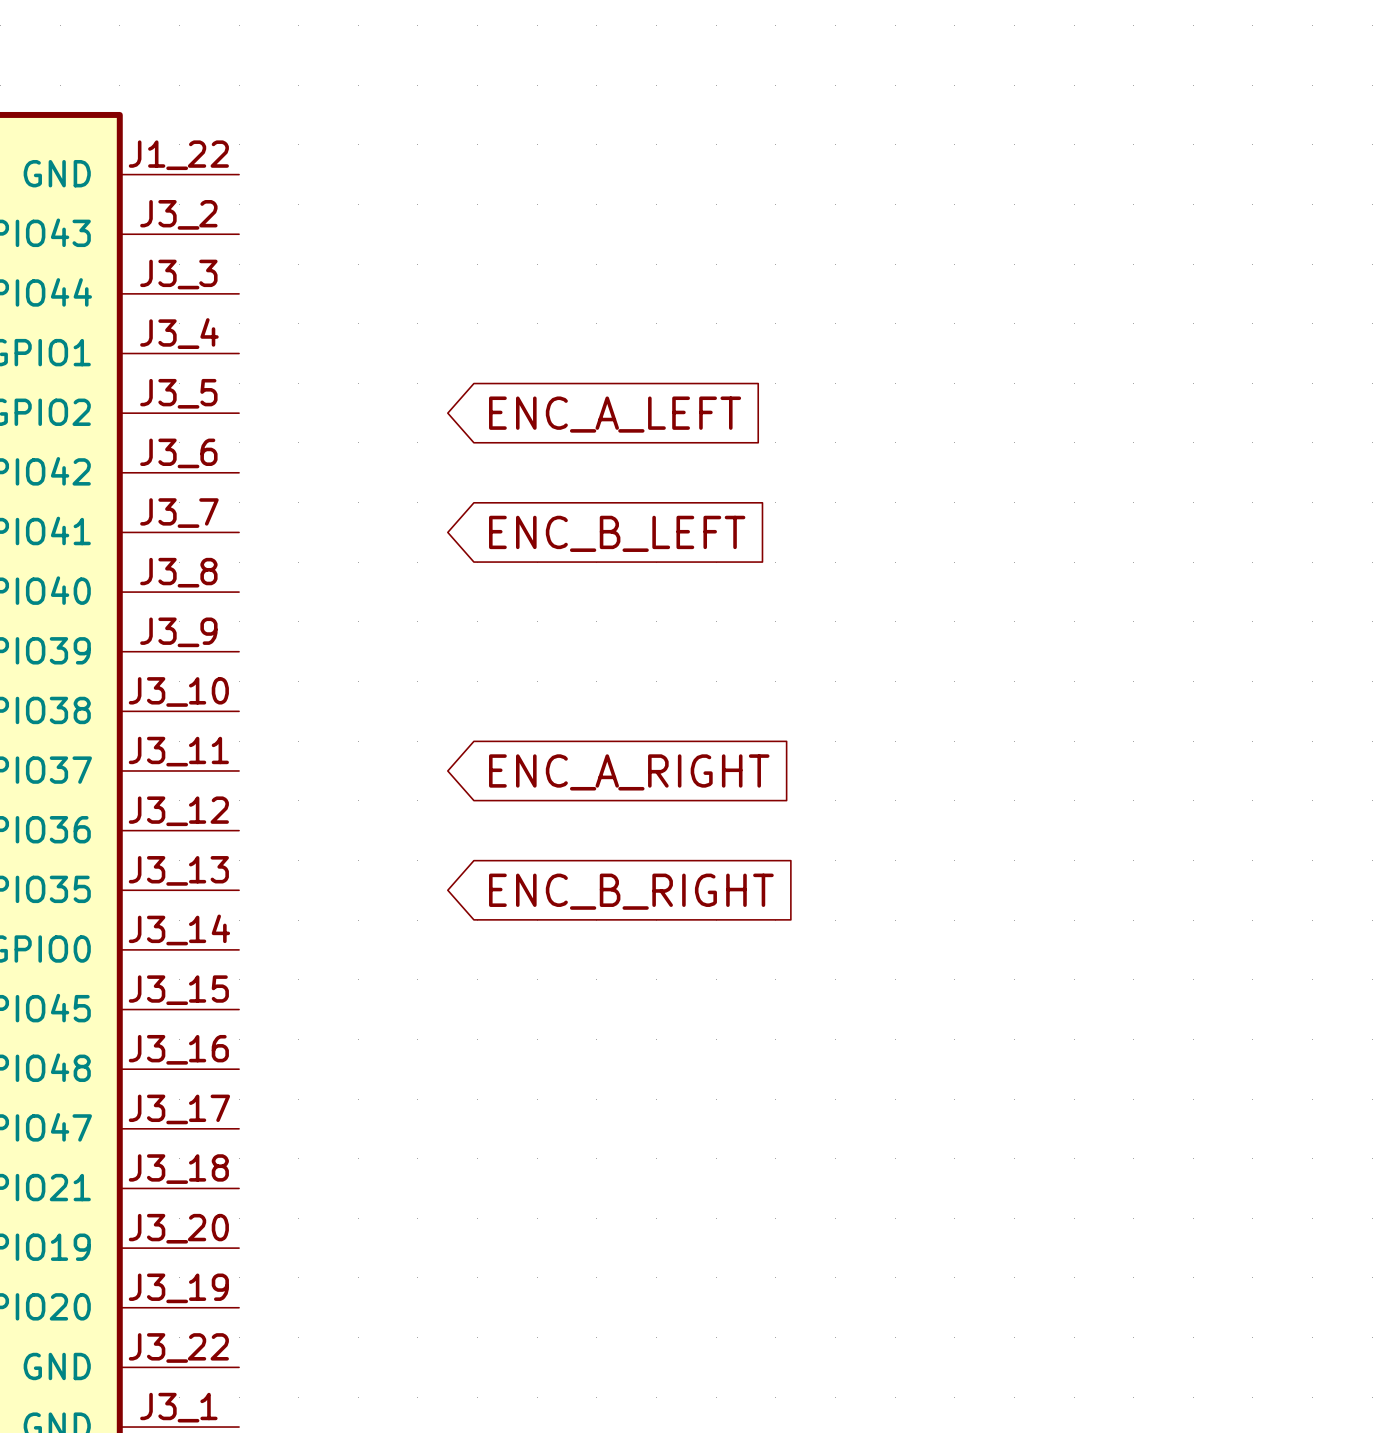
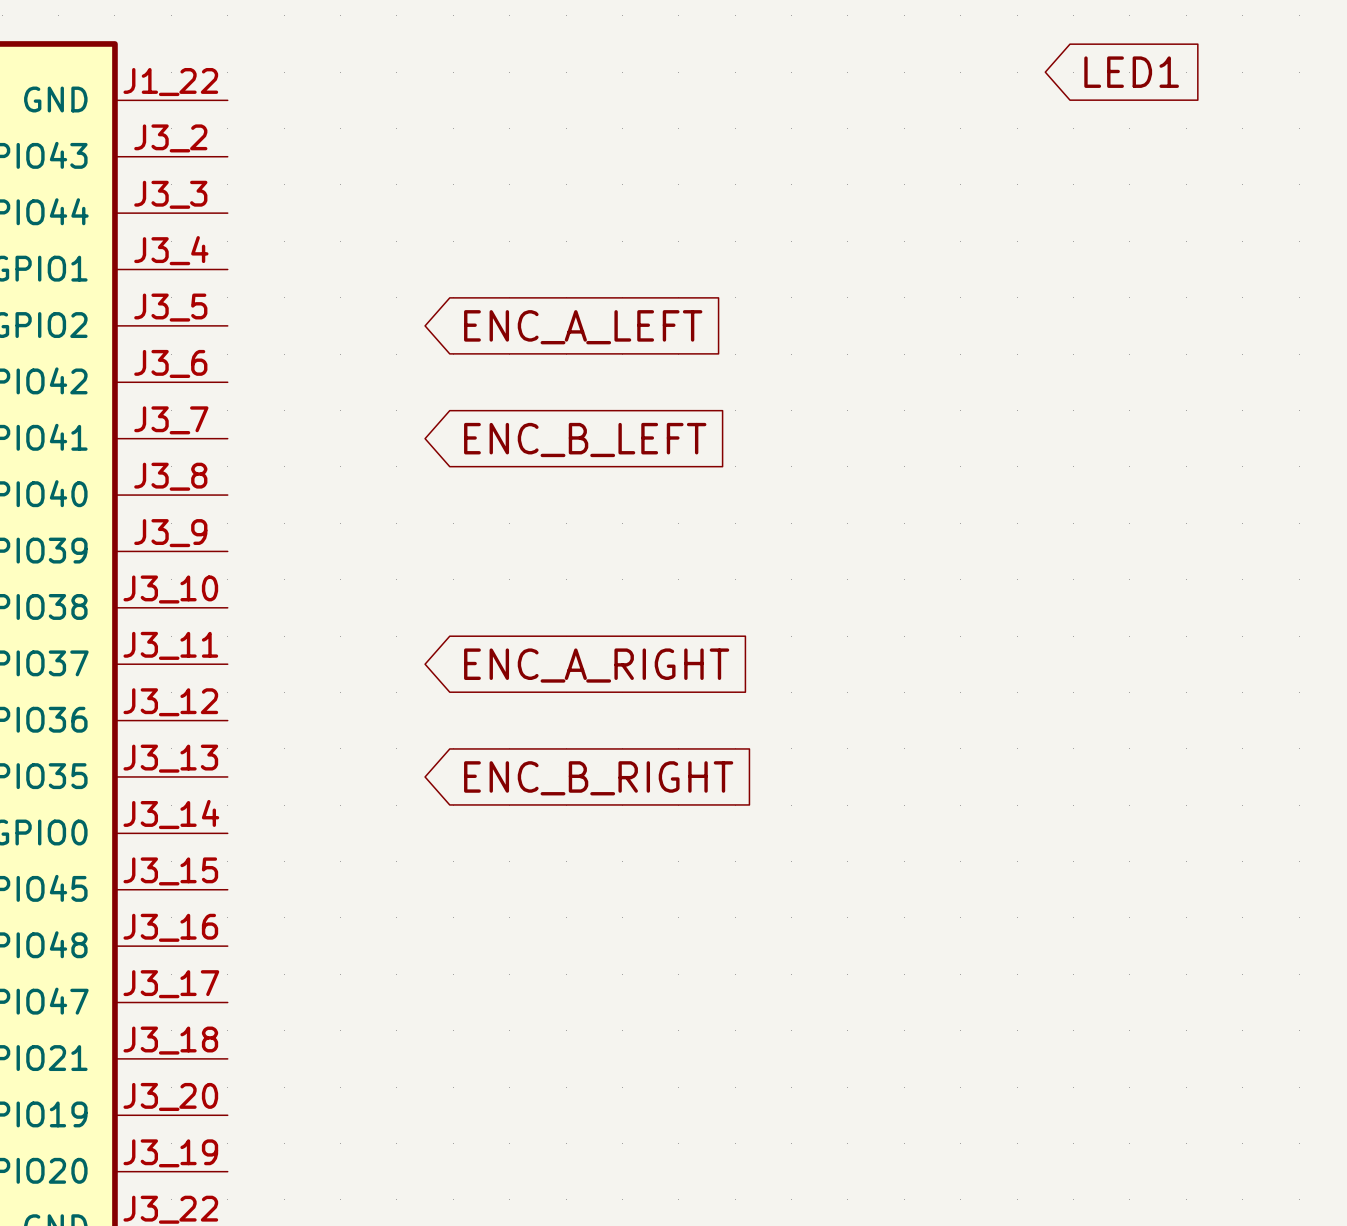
global label: none -> LED1 (1131, 72)

